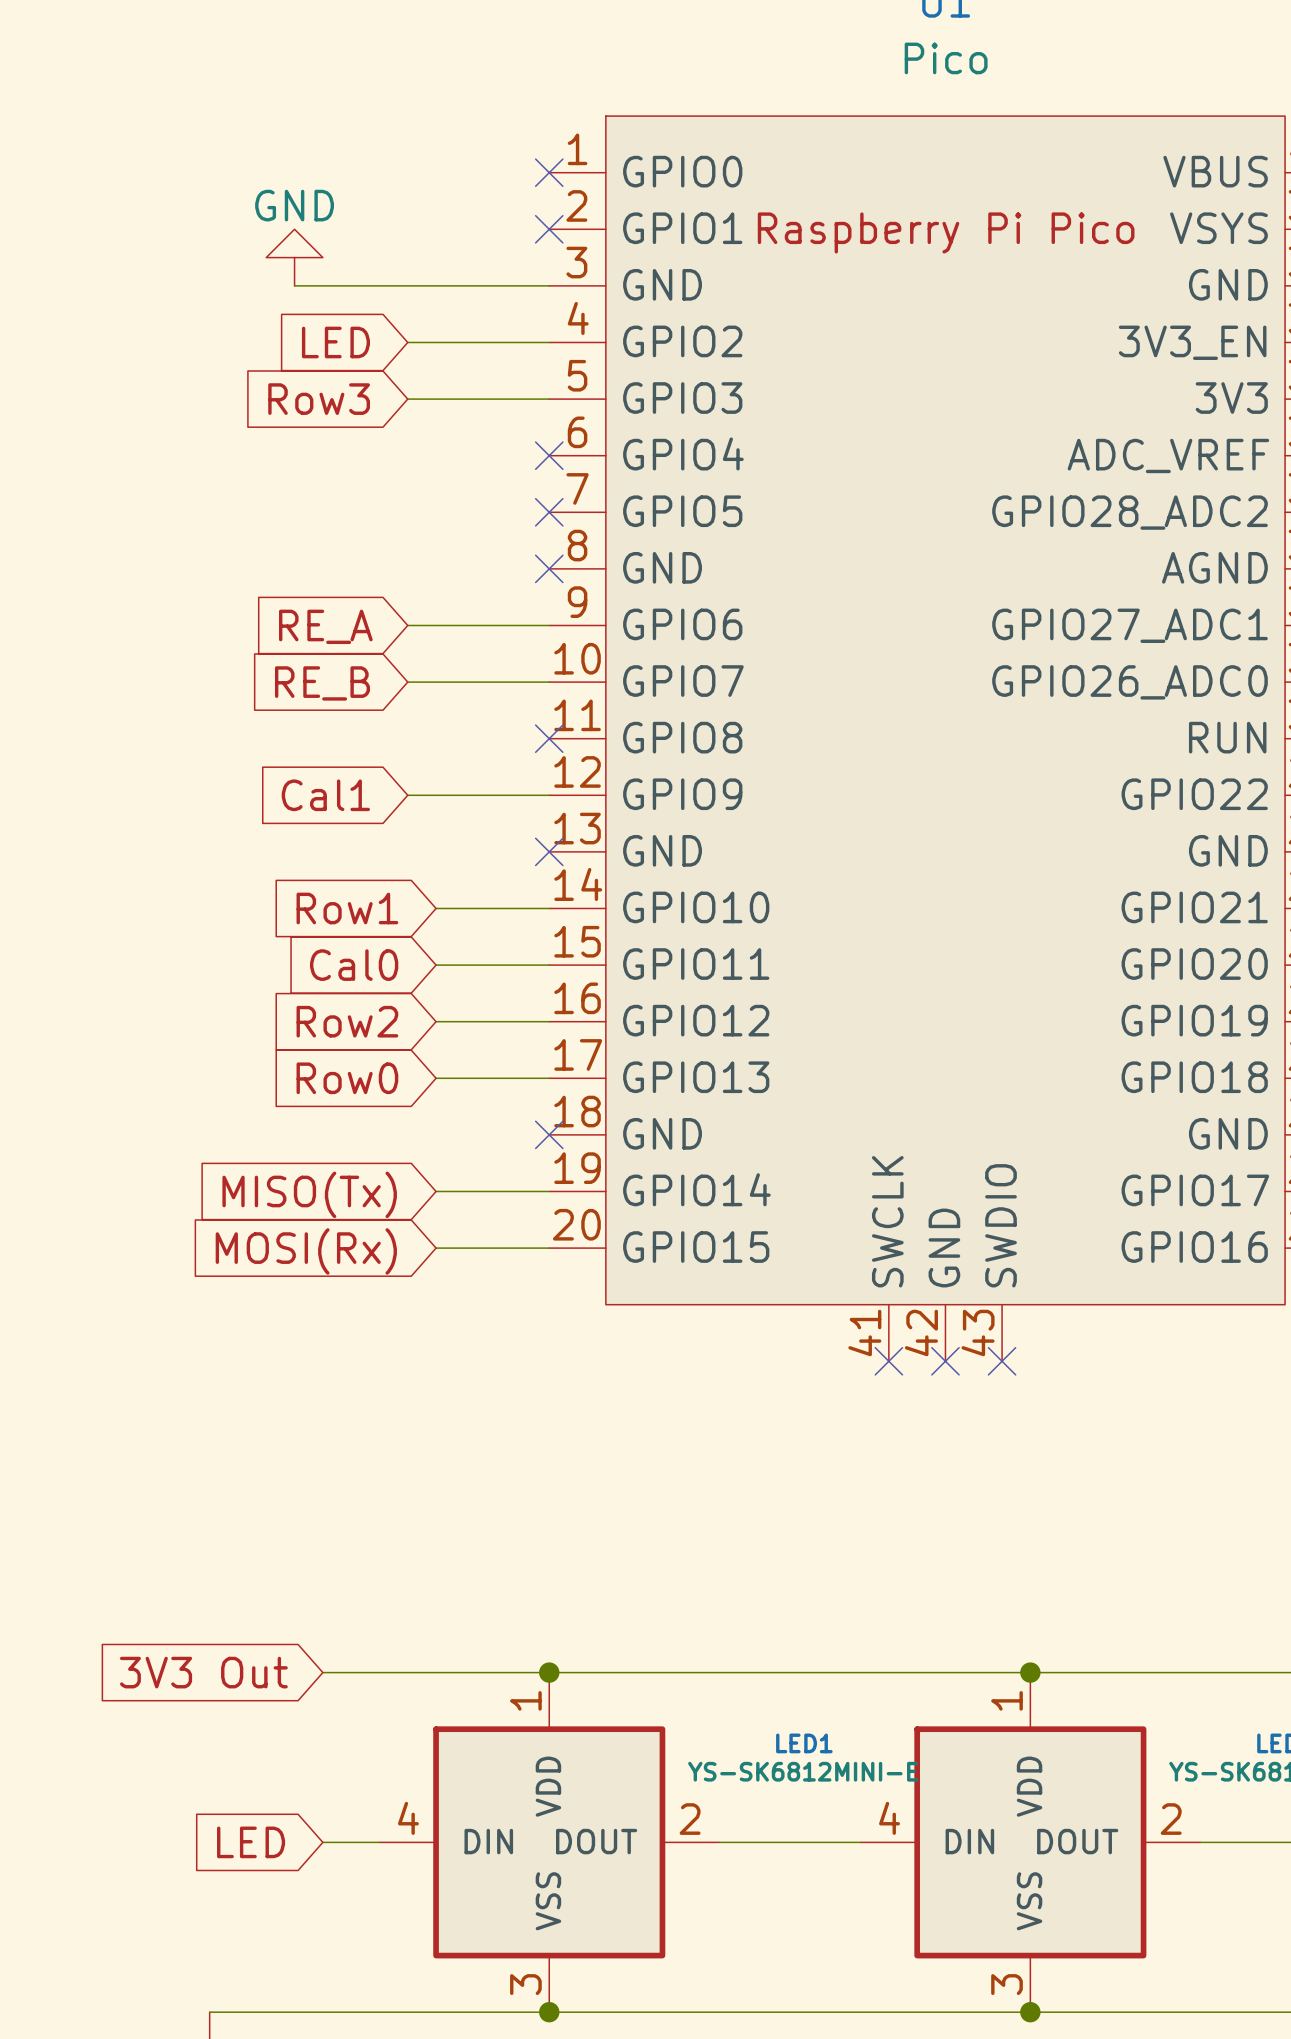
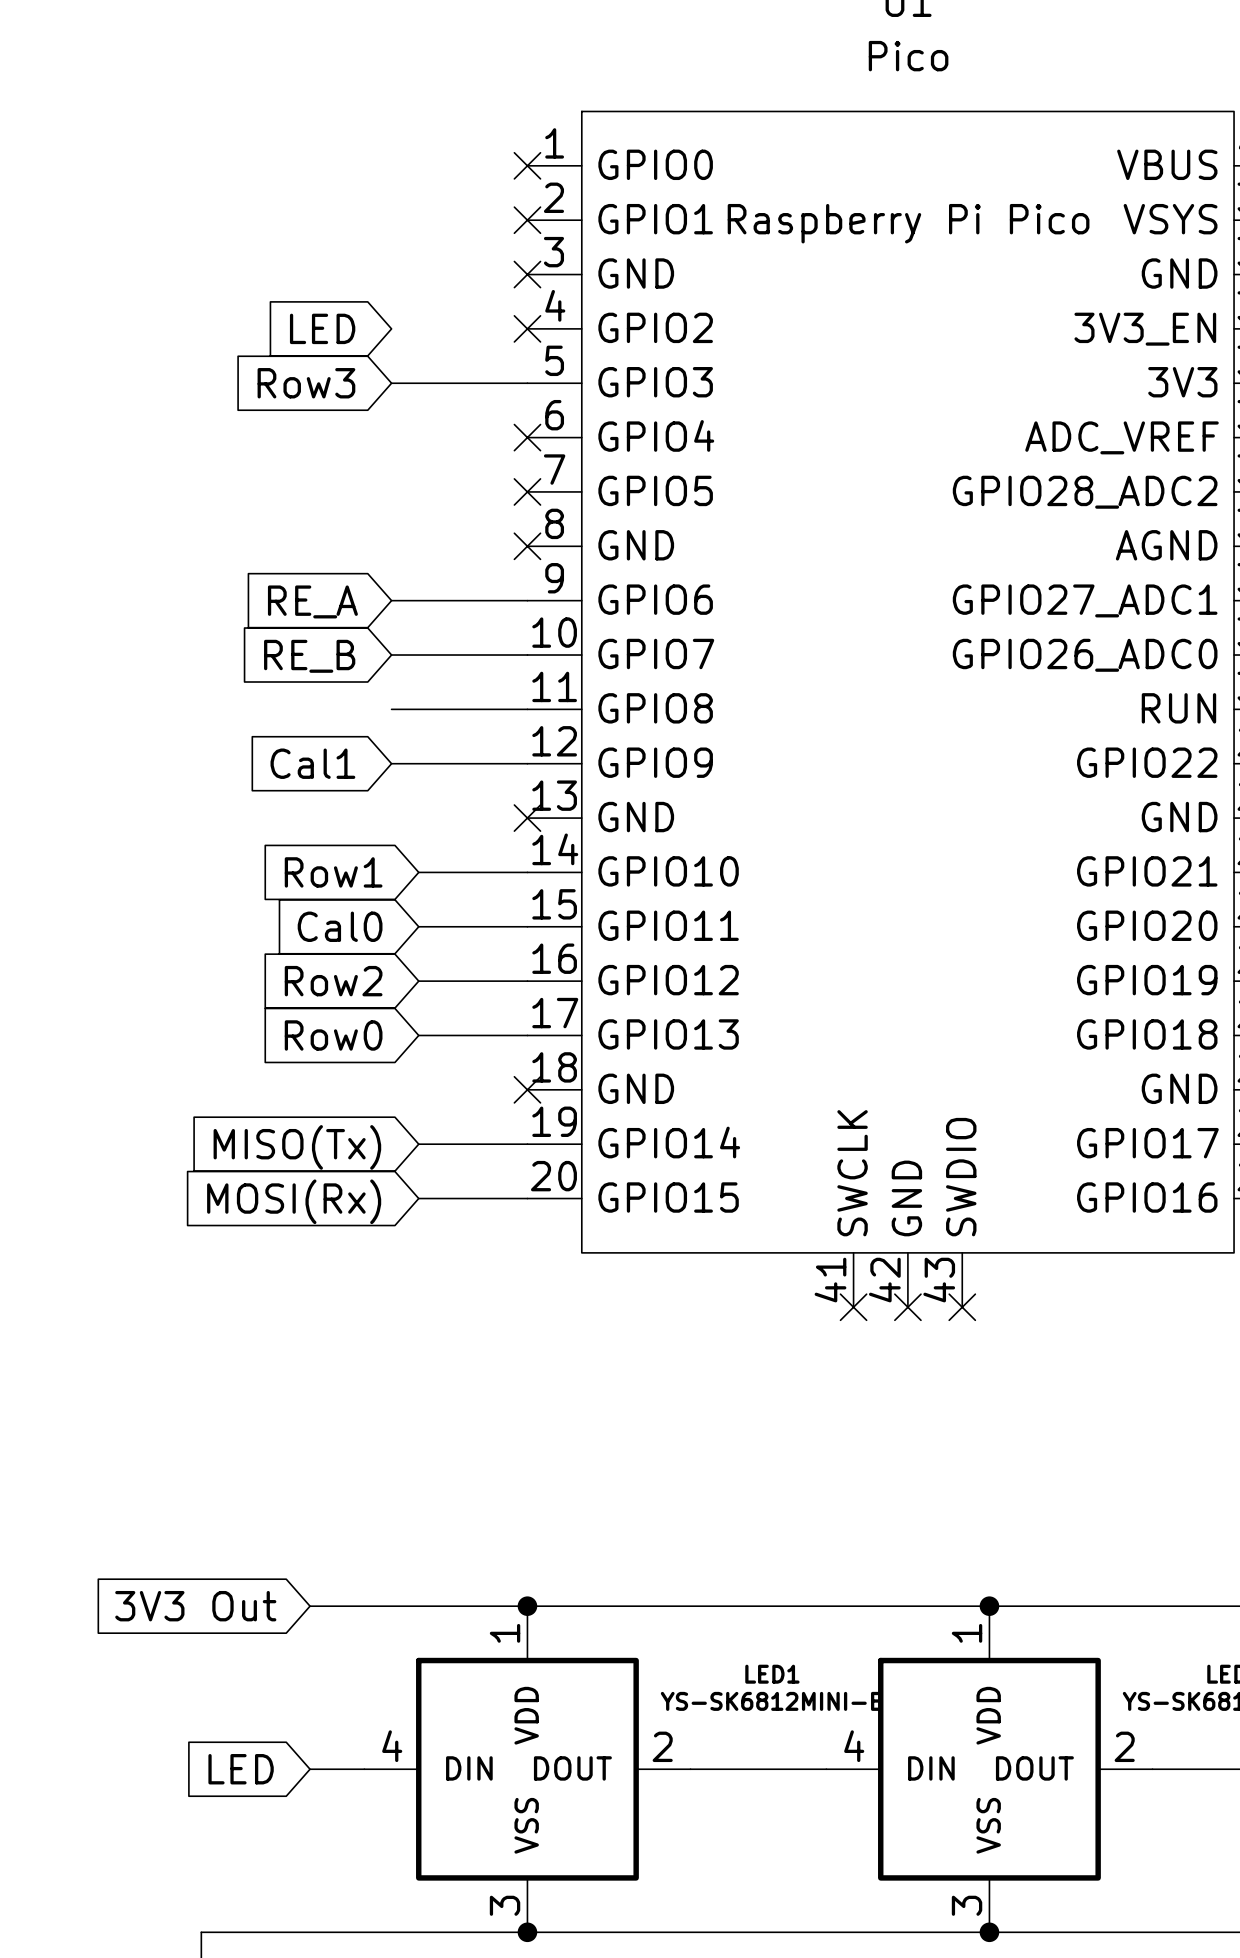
power symbol: GND (294, 257) -> none
wire: (294, 285) (549, 285) -> none
no-connect mark: none -> (527, 274)
wire: (407, 342) (549, 342) -> (391, 709) (527, 709)
no-connect mark: none -> (527, 328)
no-connect mark: (549, 738) -> none

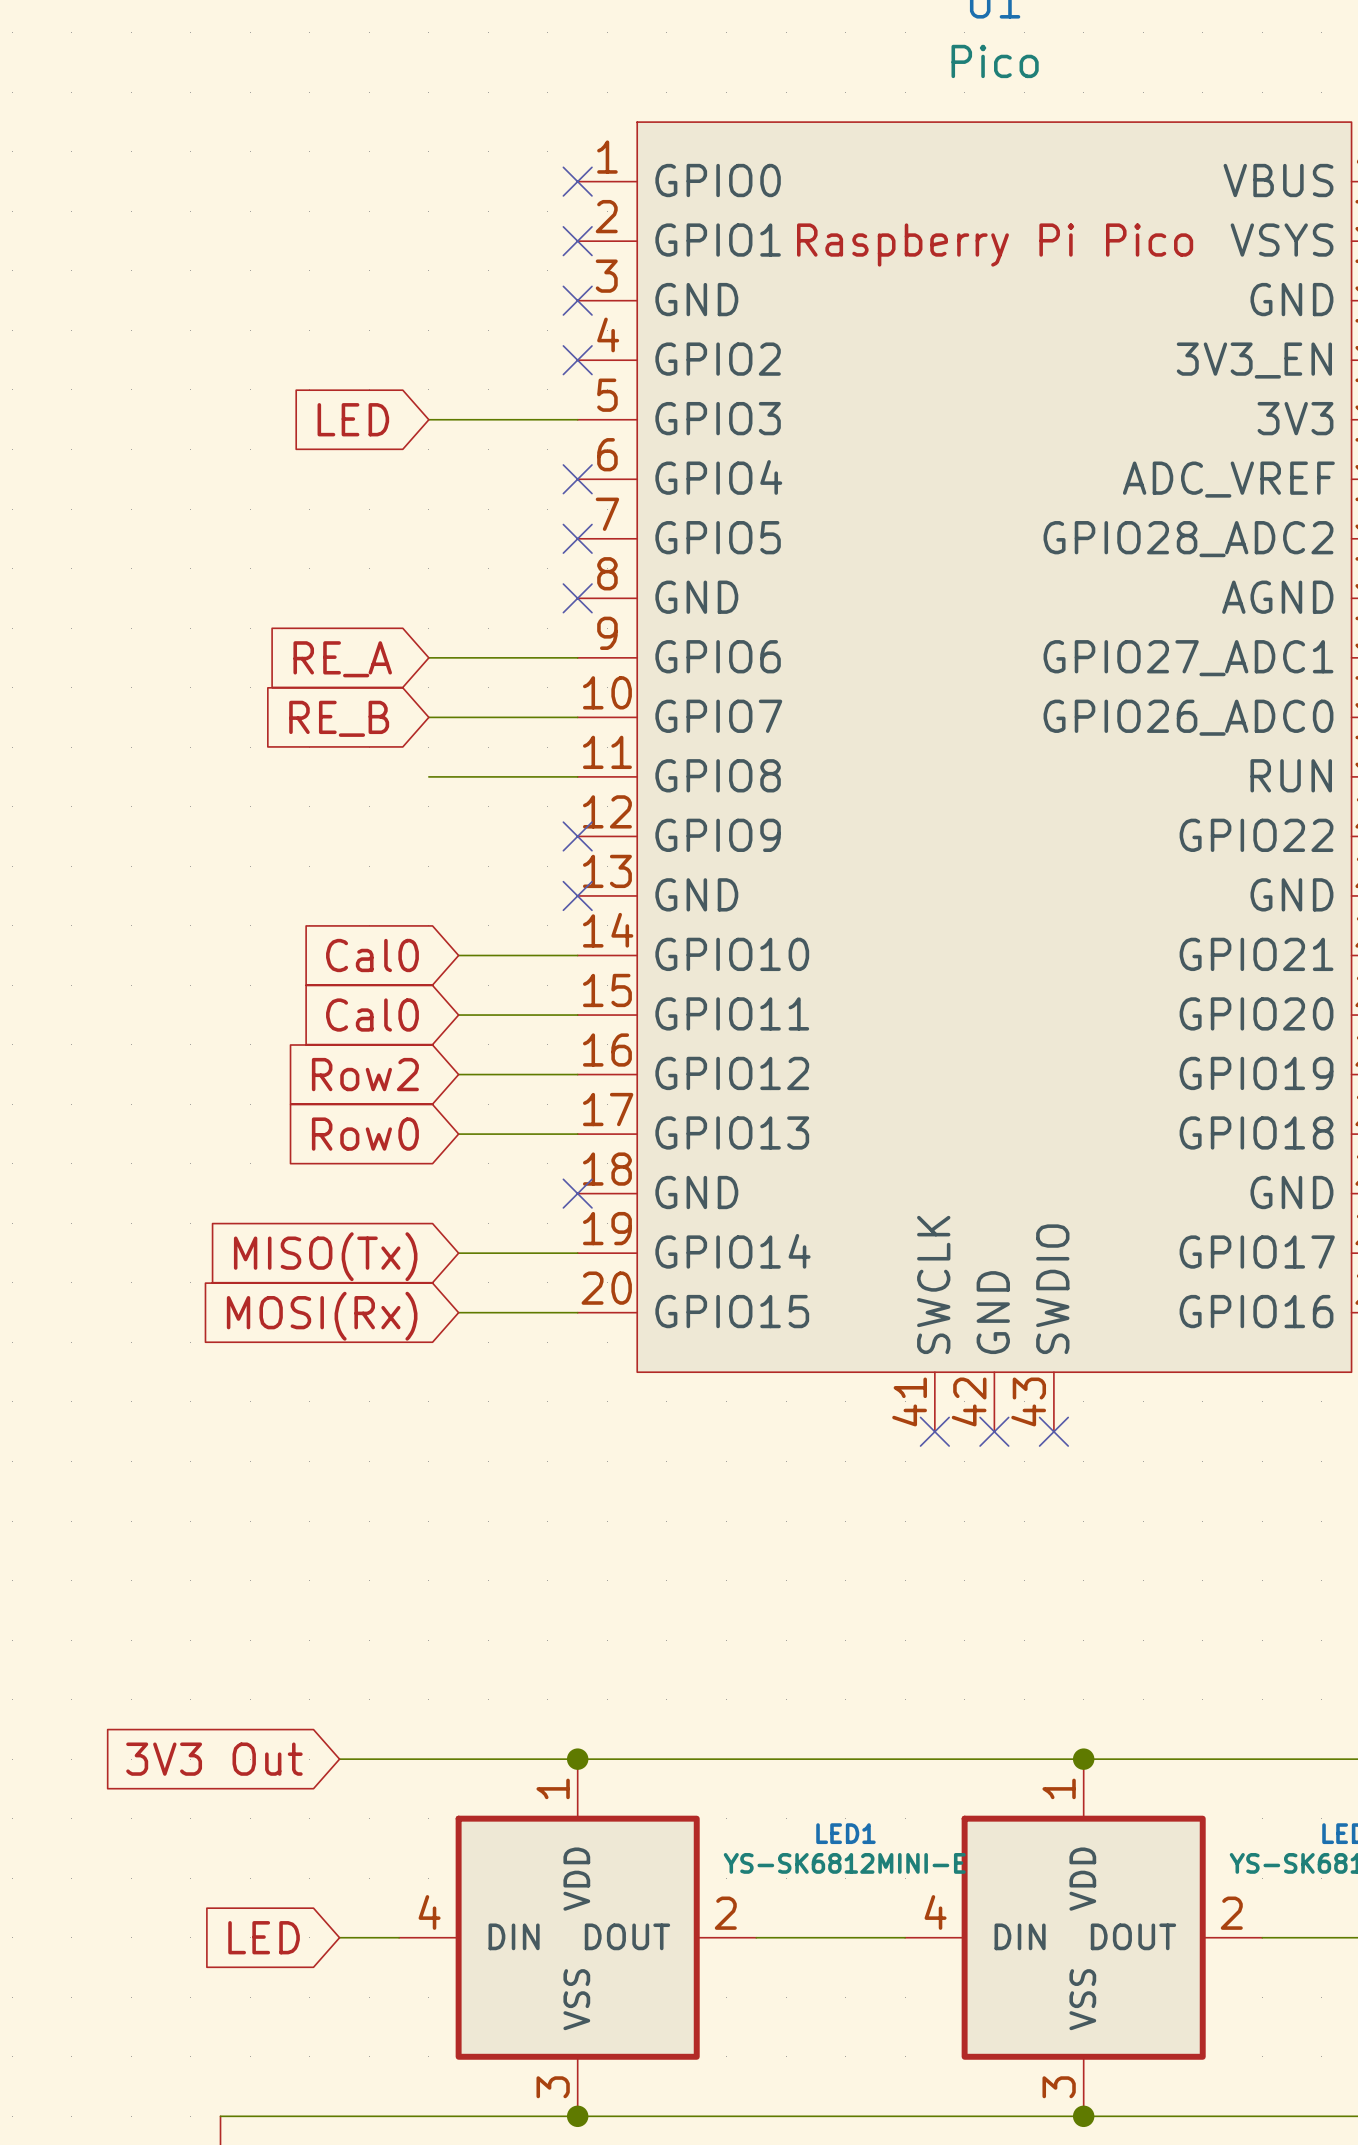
global label: LED (322, 328) -> none
global label: Row3 (306, 383) -> LED (353, 419)
global label: Cal1 (312, 763) -> none
wire: (391, 763) (527, 763) -> none
no-connect mark: none -> (577, 836)
global label: Row1 (333, 872) -> Cal0 (372, 955)

